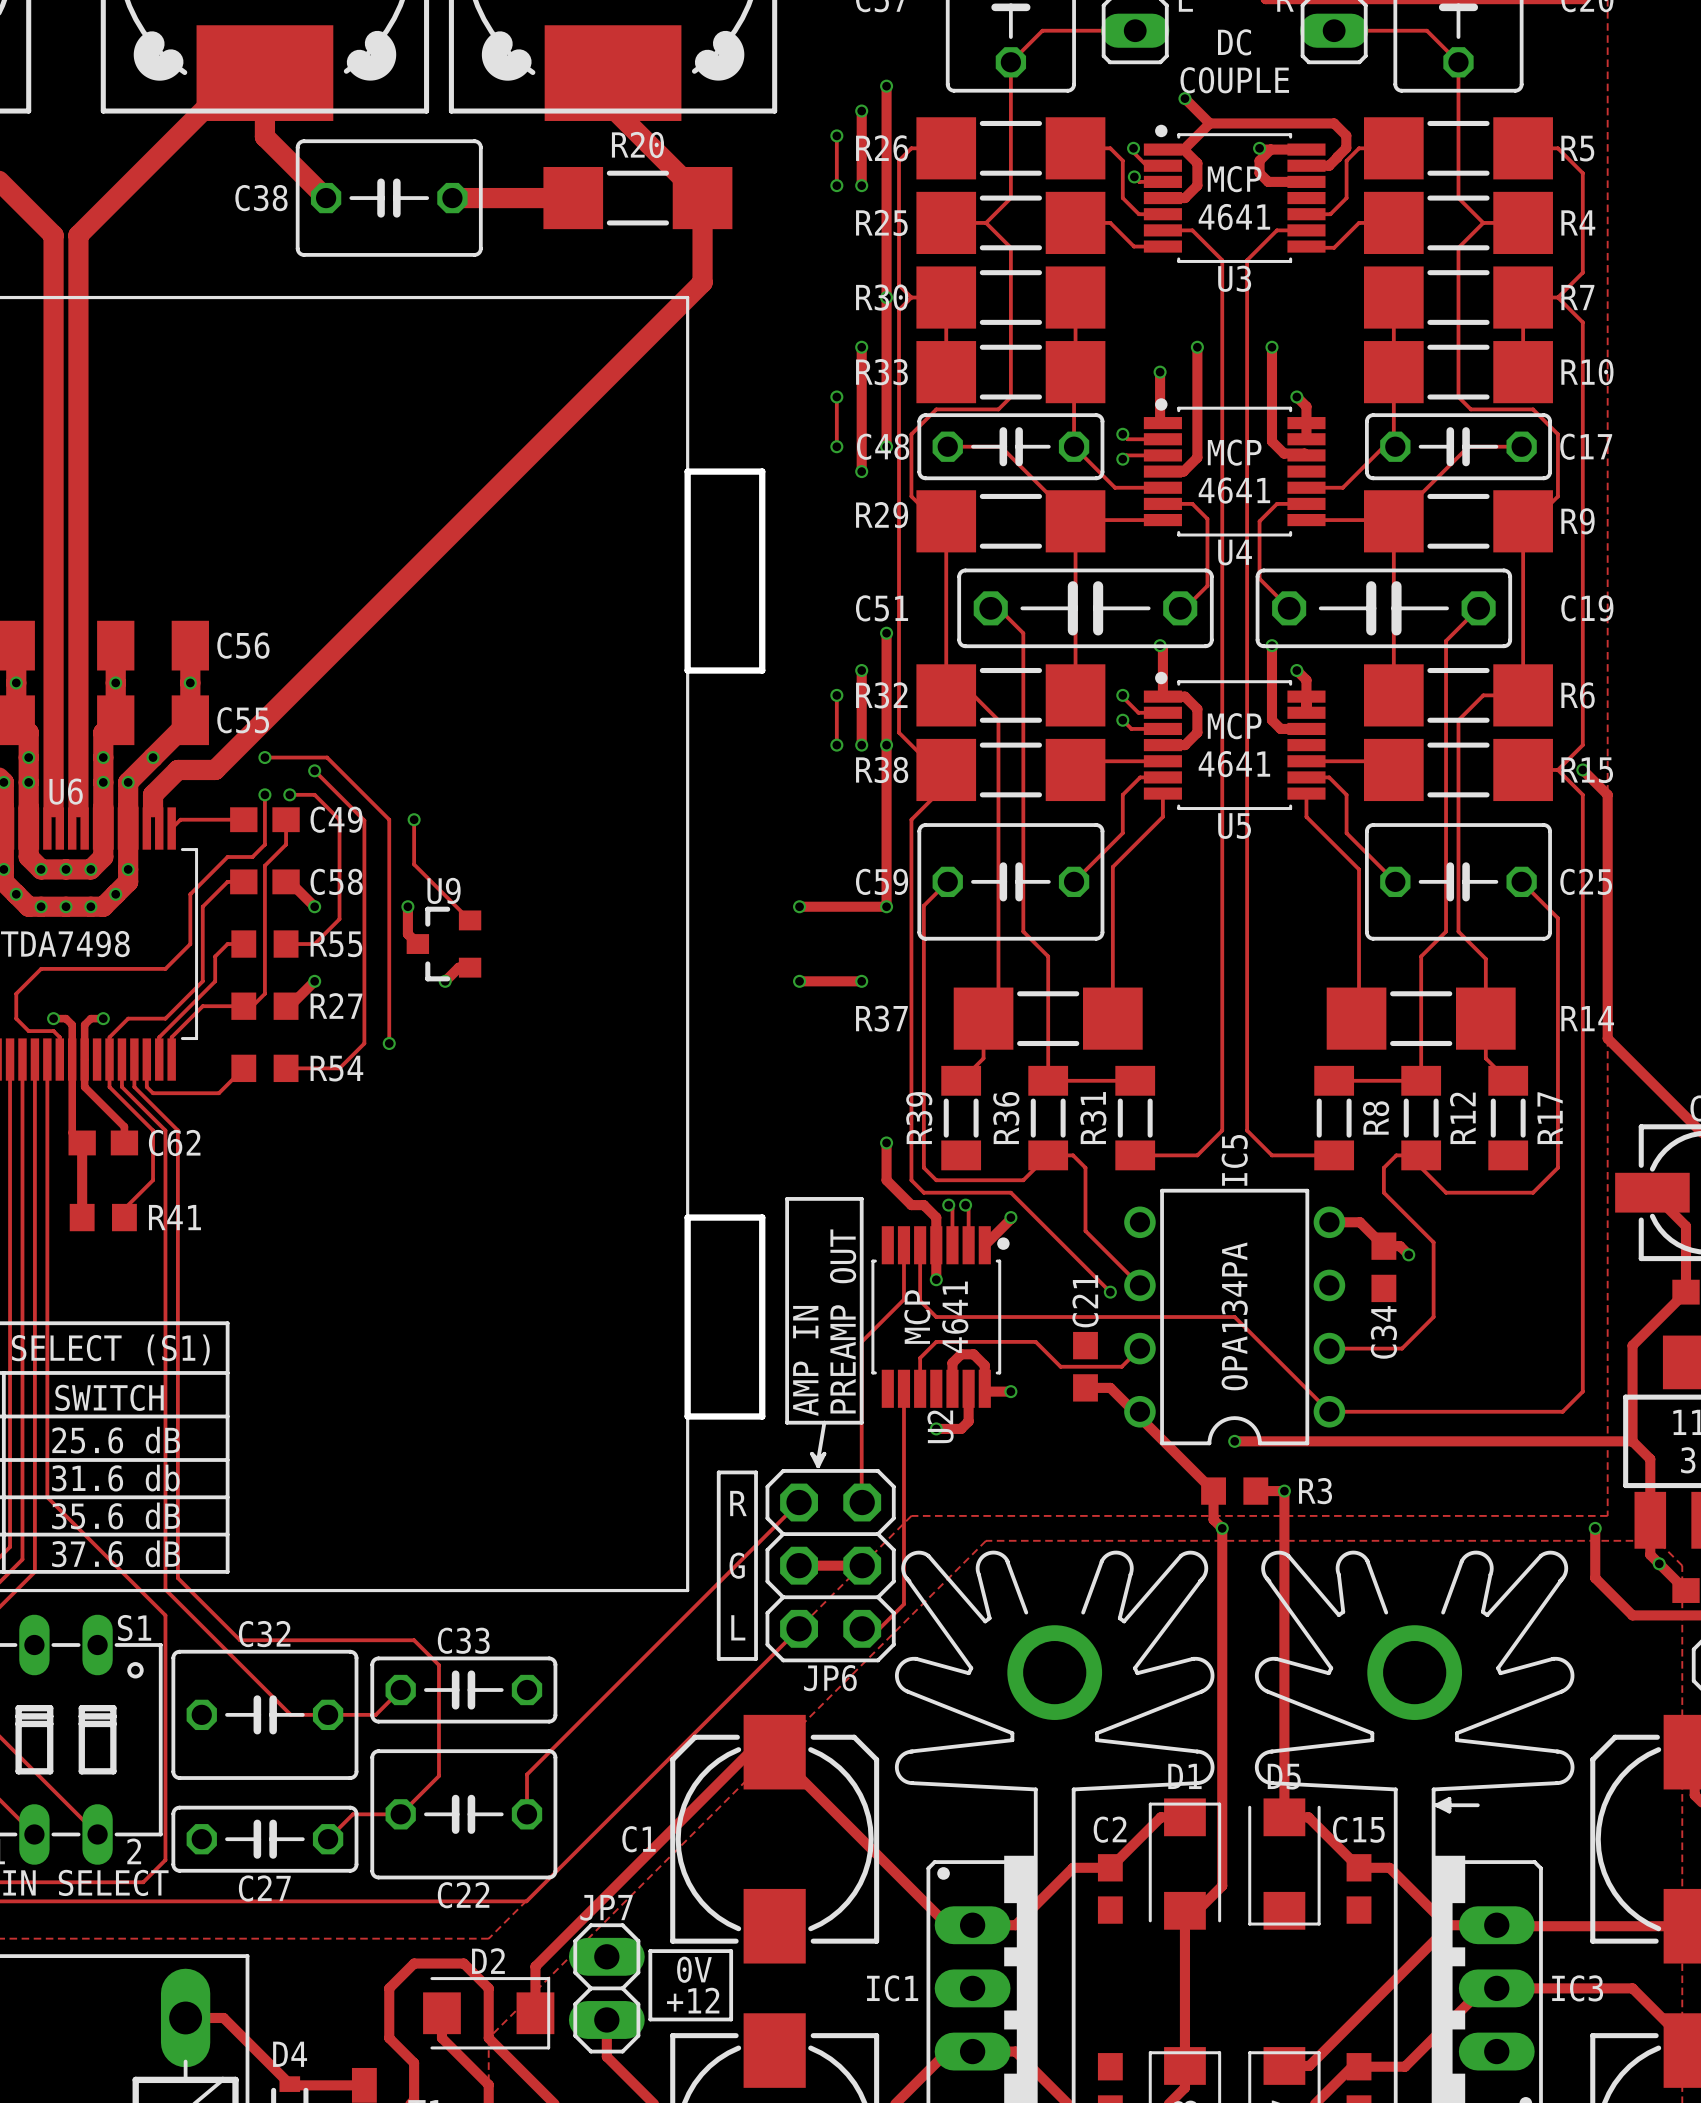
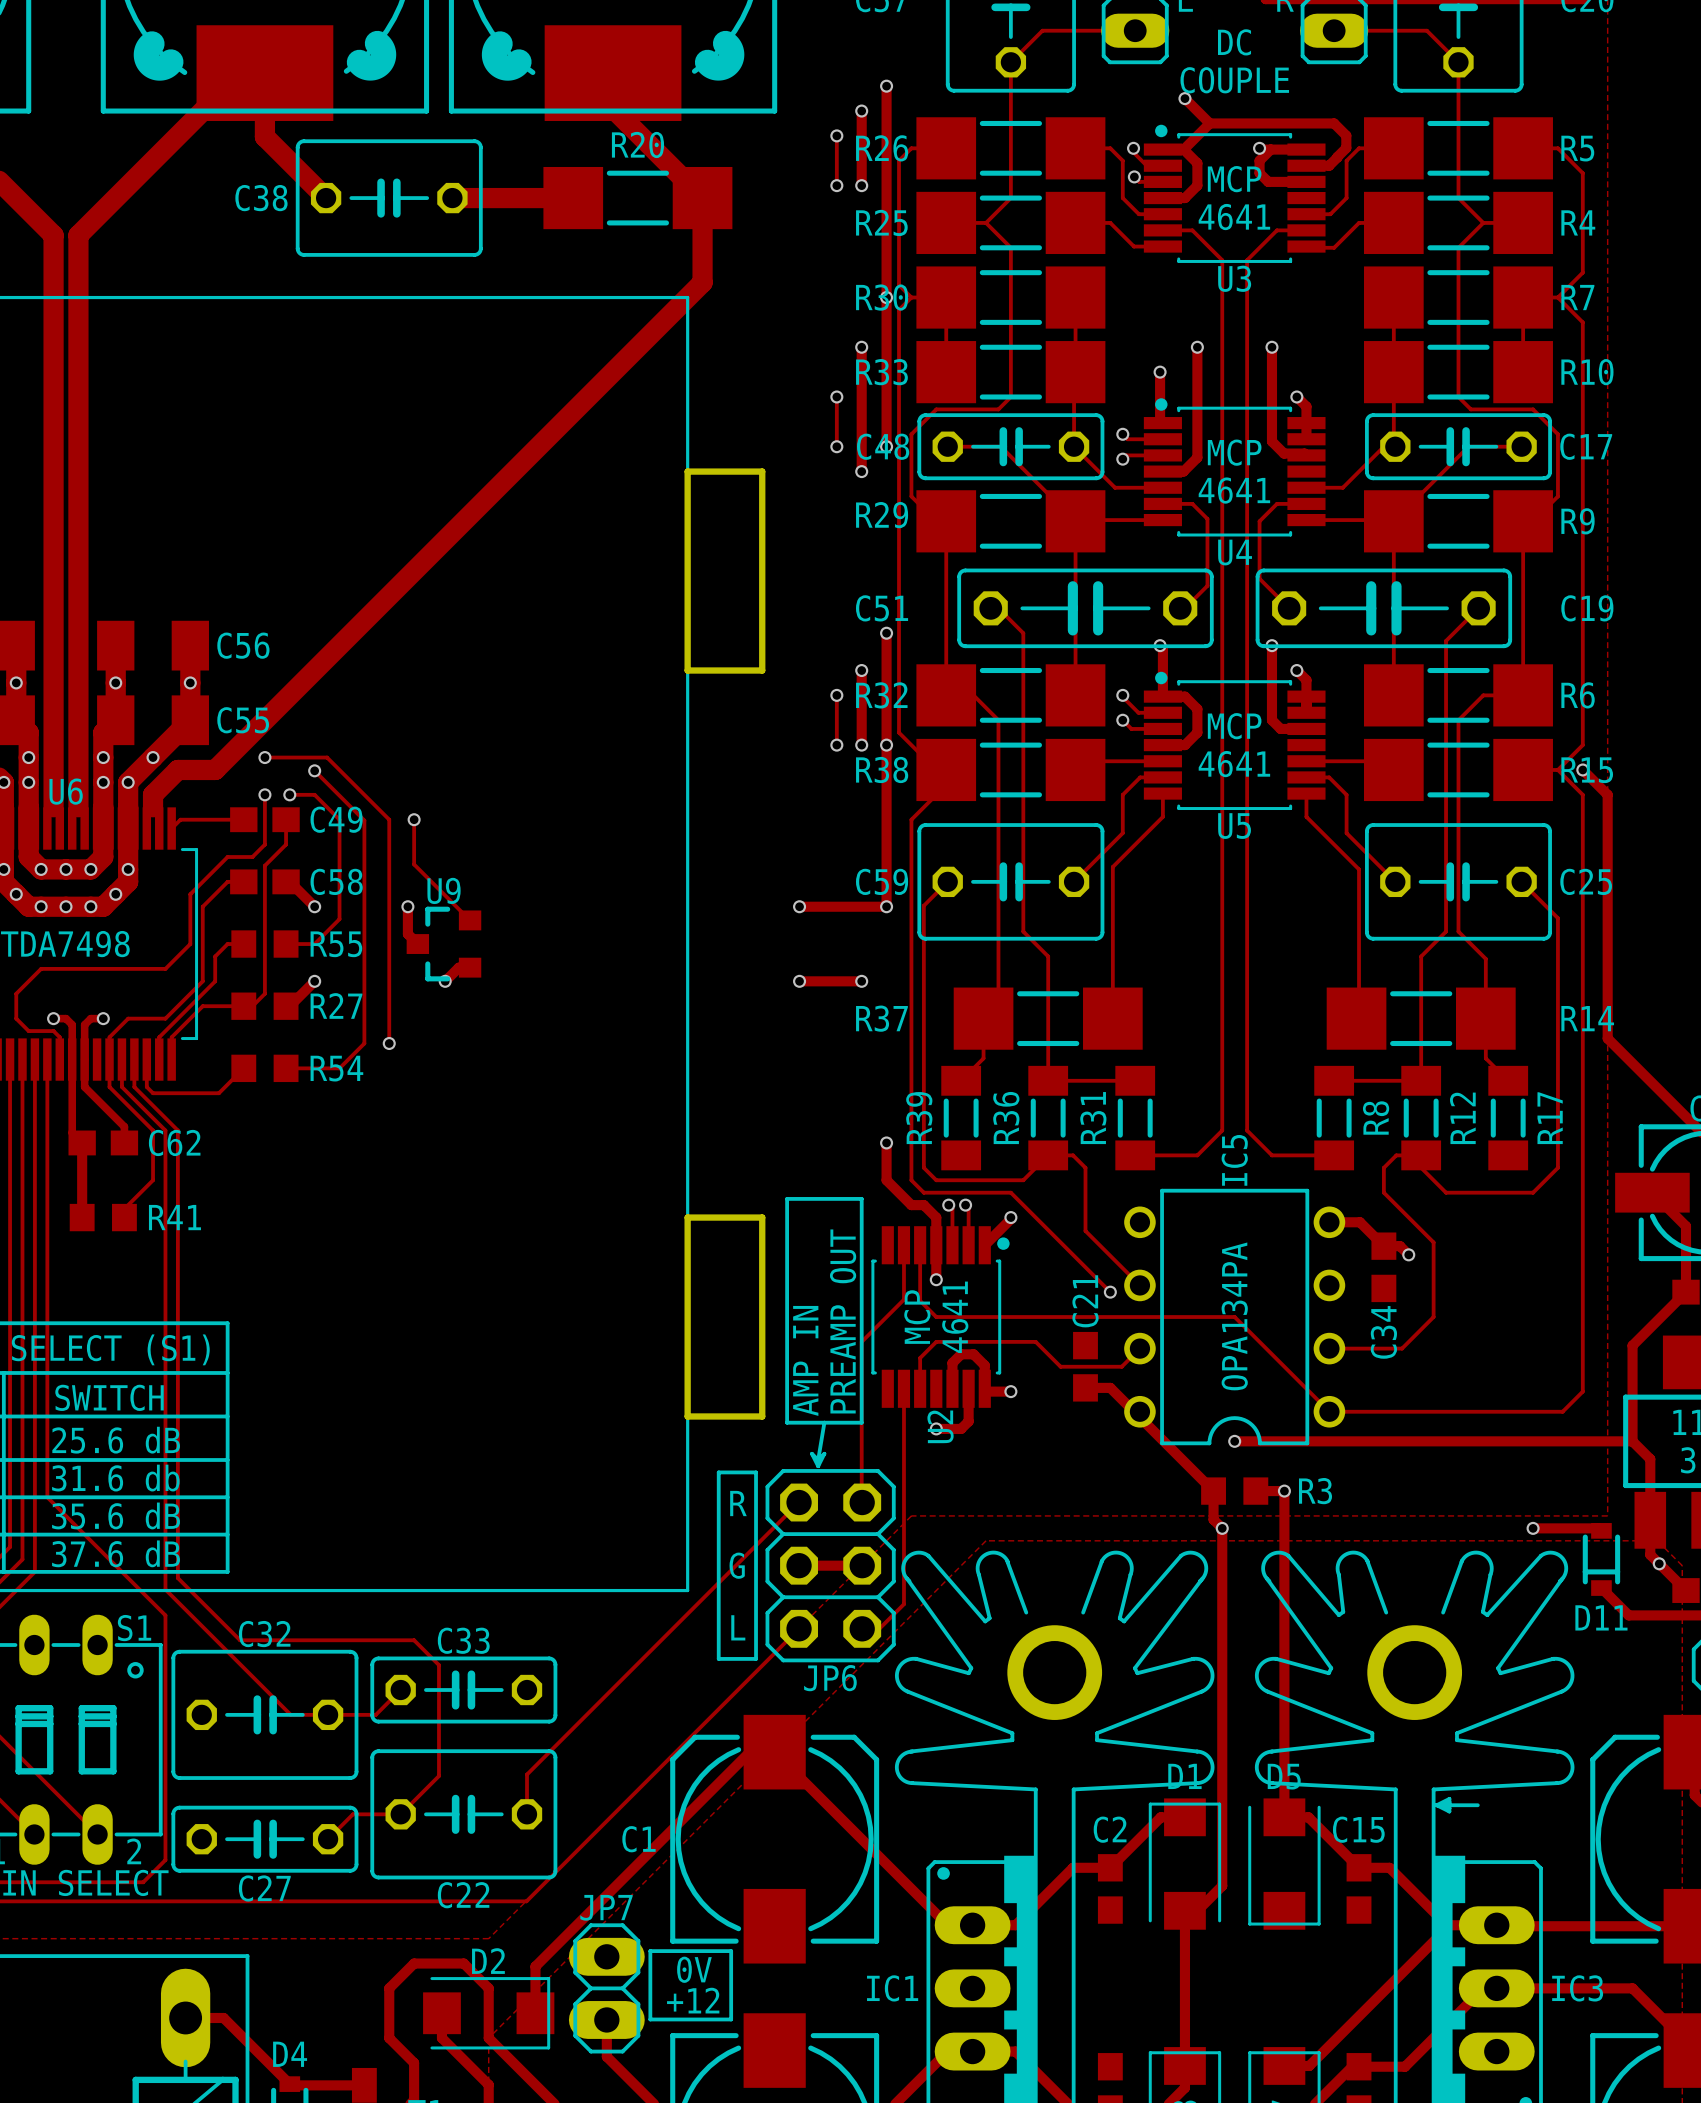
track: none -> (1533, 1528) (1598, 1528) (1601, 1530)
track: (1595, 1528) (1595, 1578) (1632, 1615) -> (1601, 1588) (1628, 1615) (1632, 1615)
via position: (1595, 1528) -> (1533, 1528)
D11: none -> (1601, 1559)

